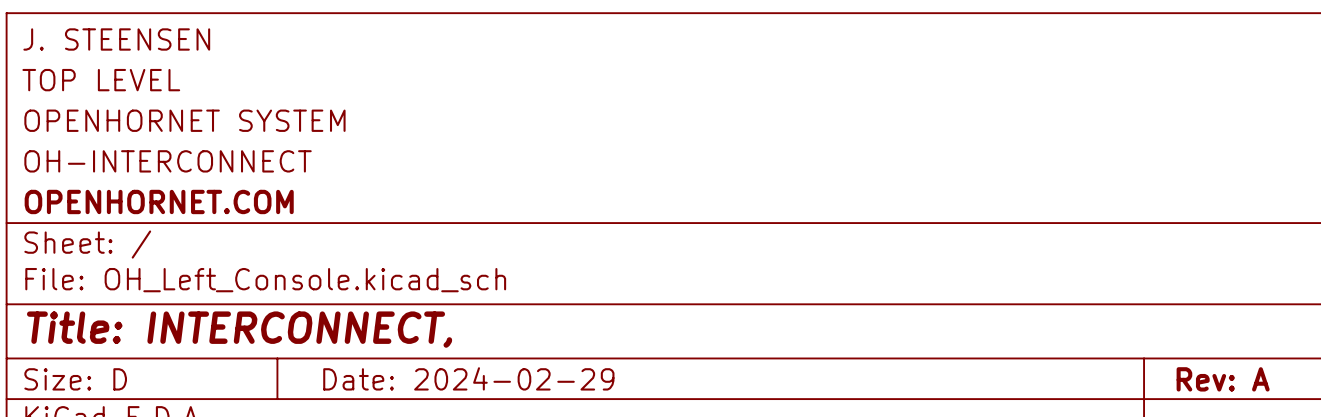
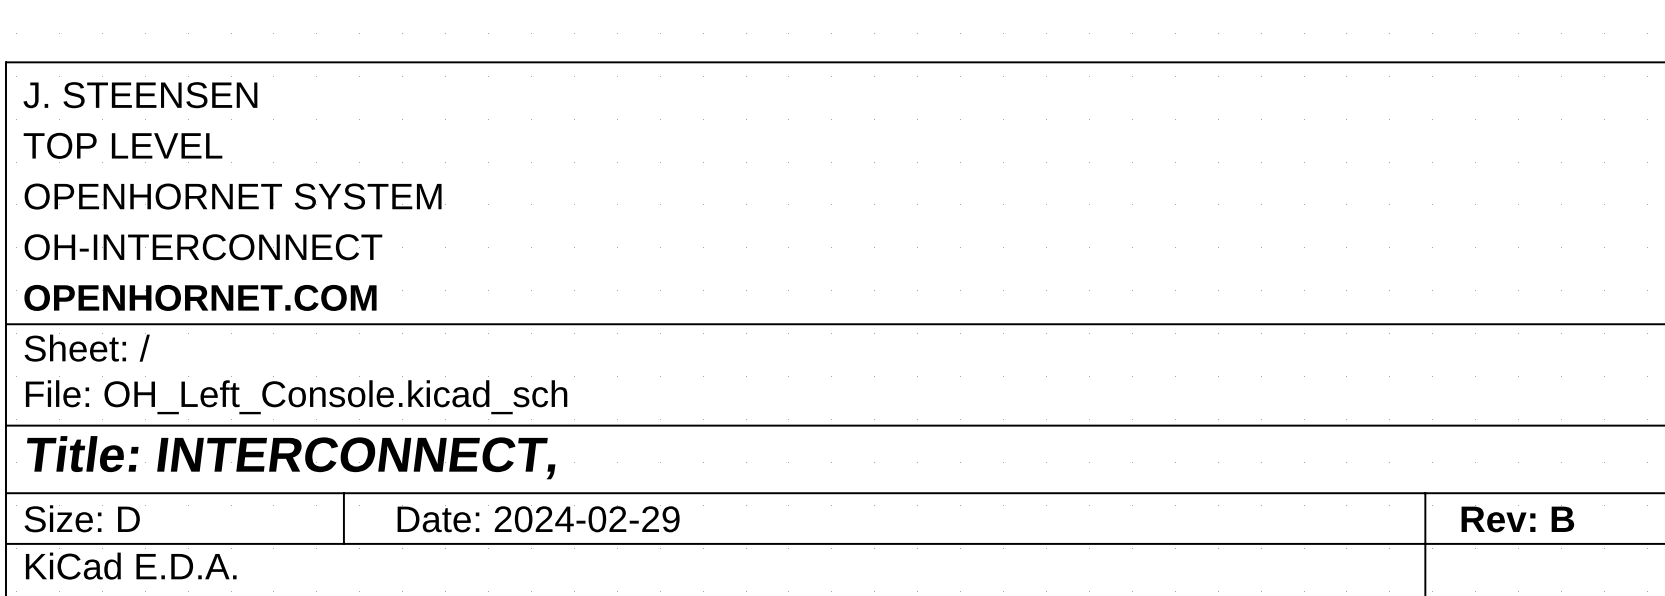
title block: Rev: A (1223, 379) -> Rev: B (1517, 519)

